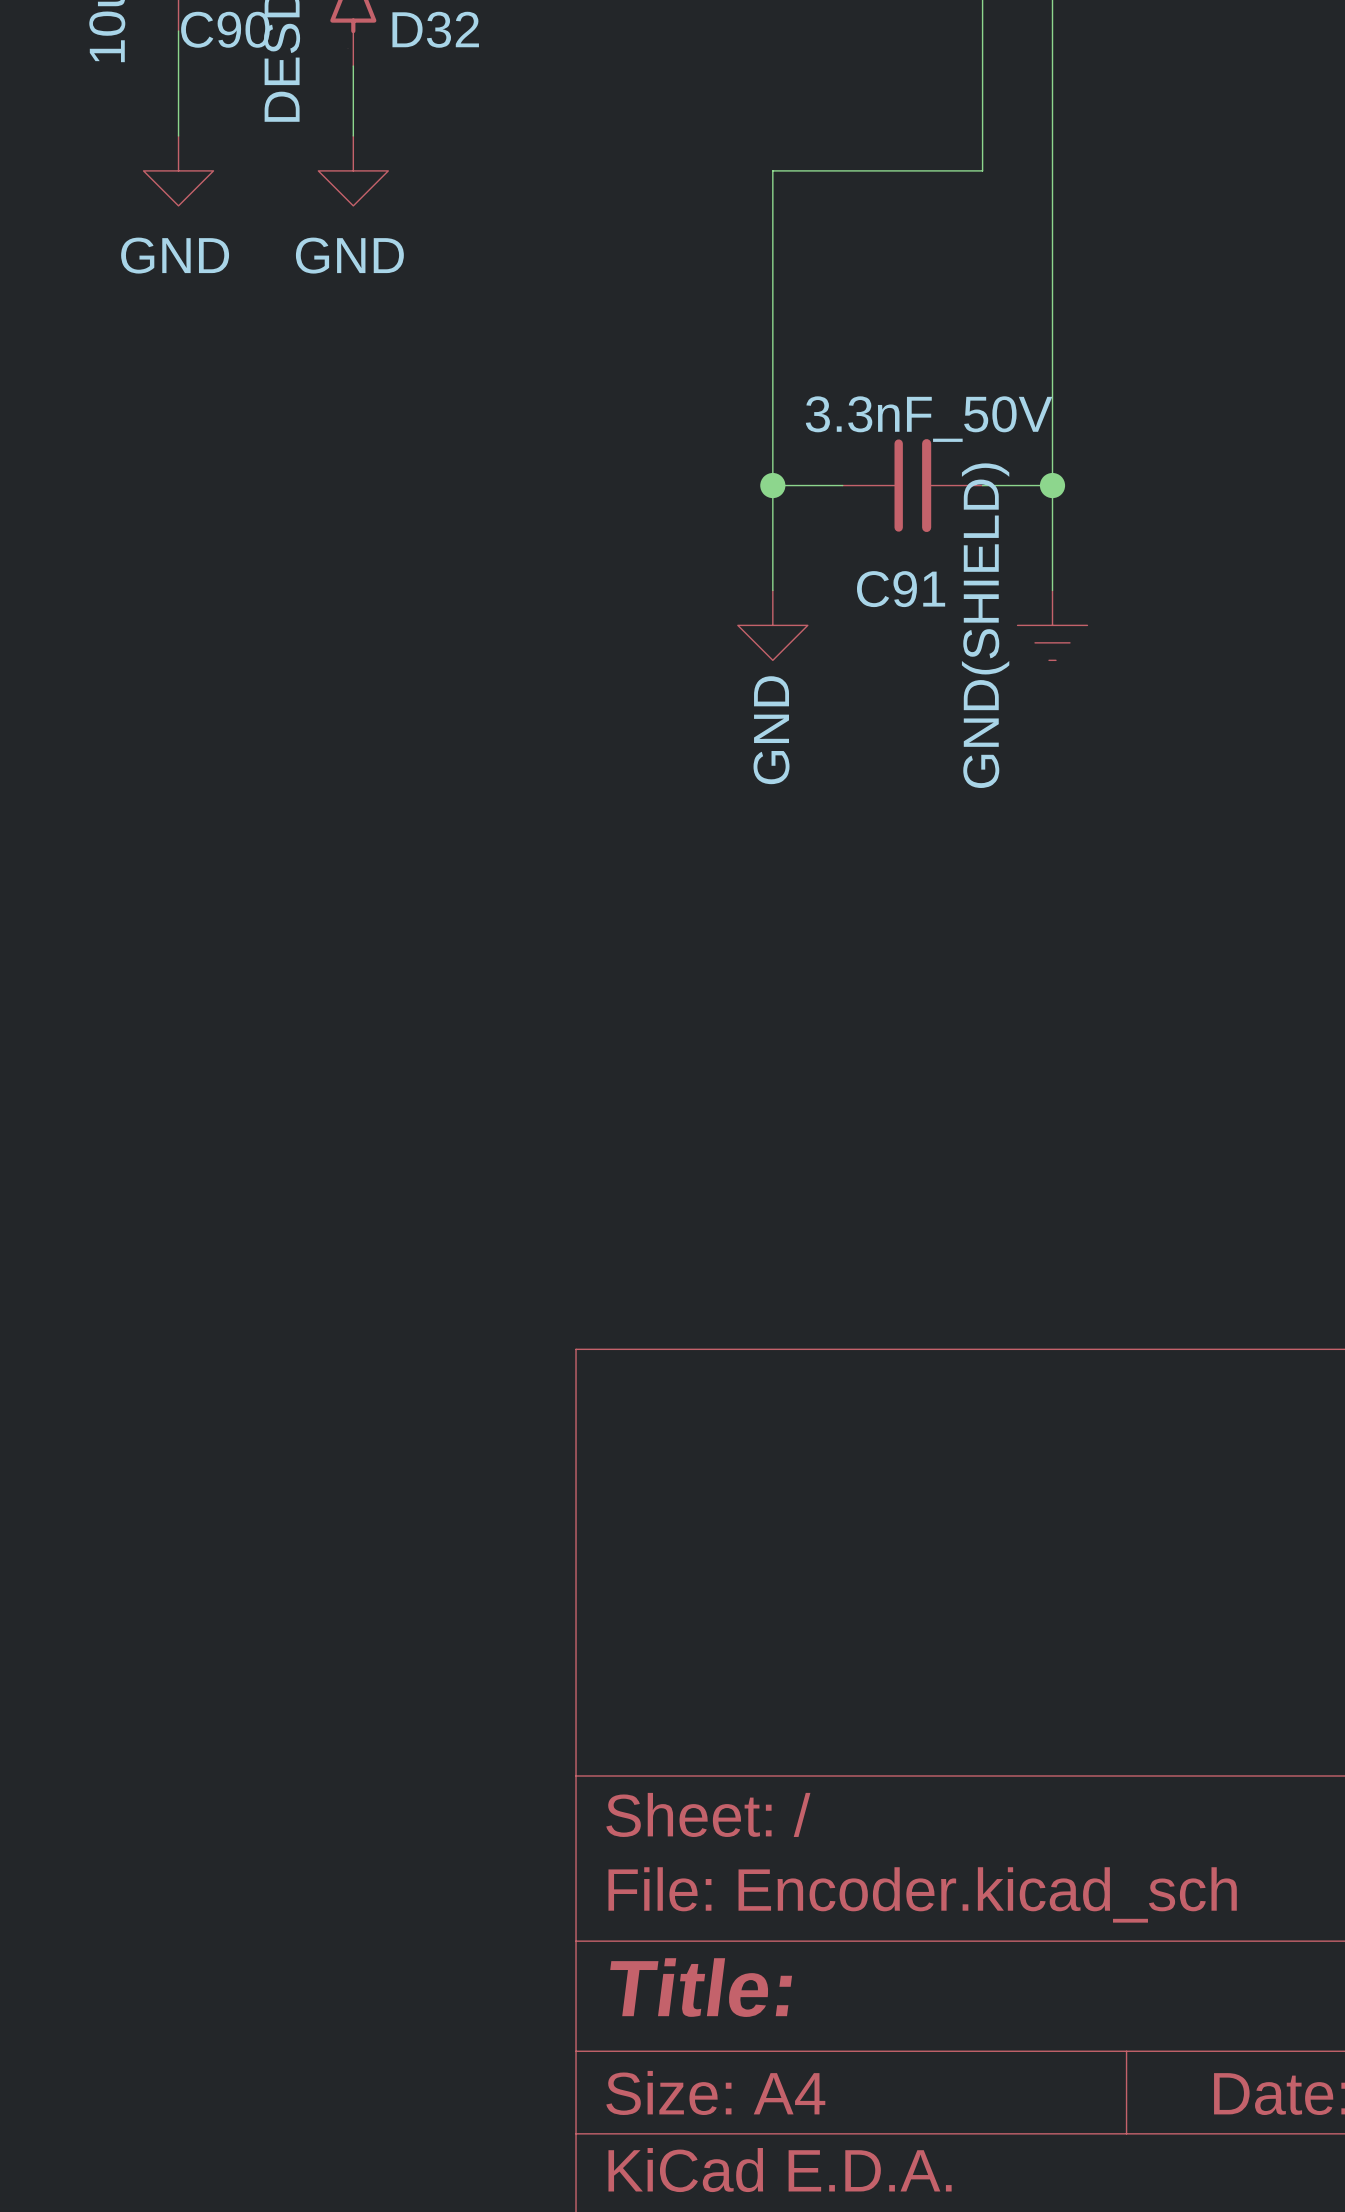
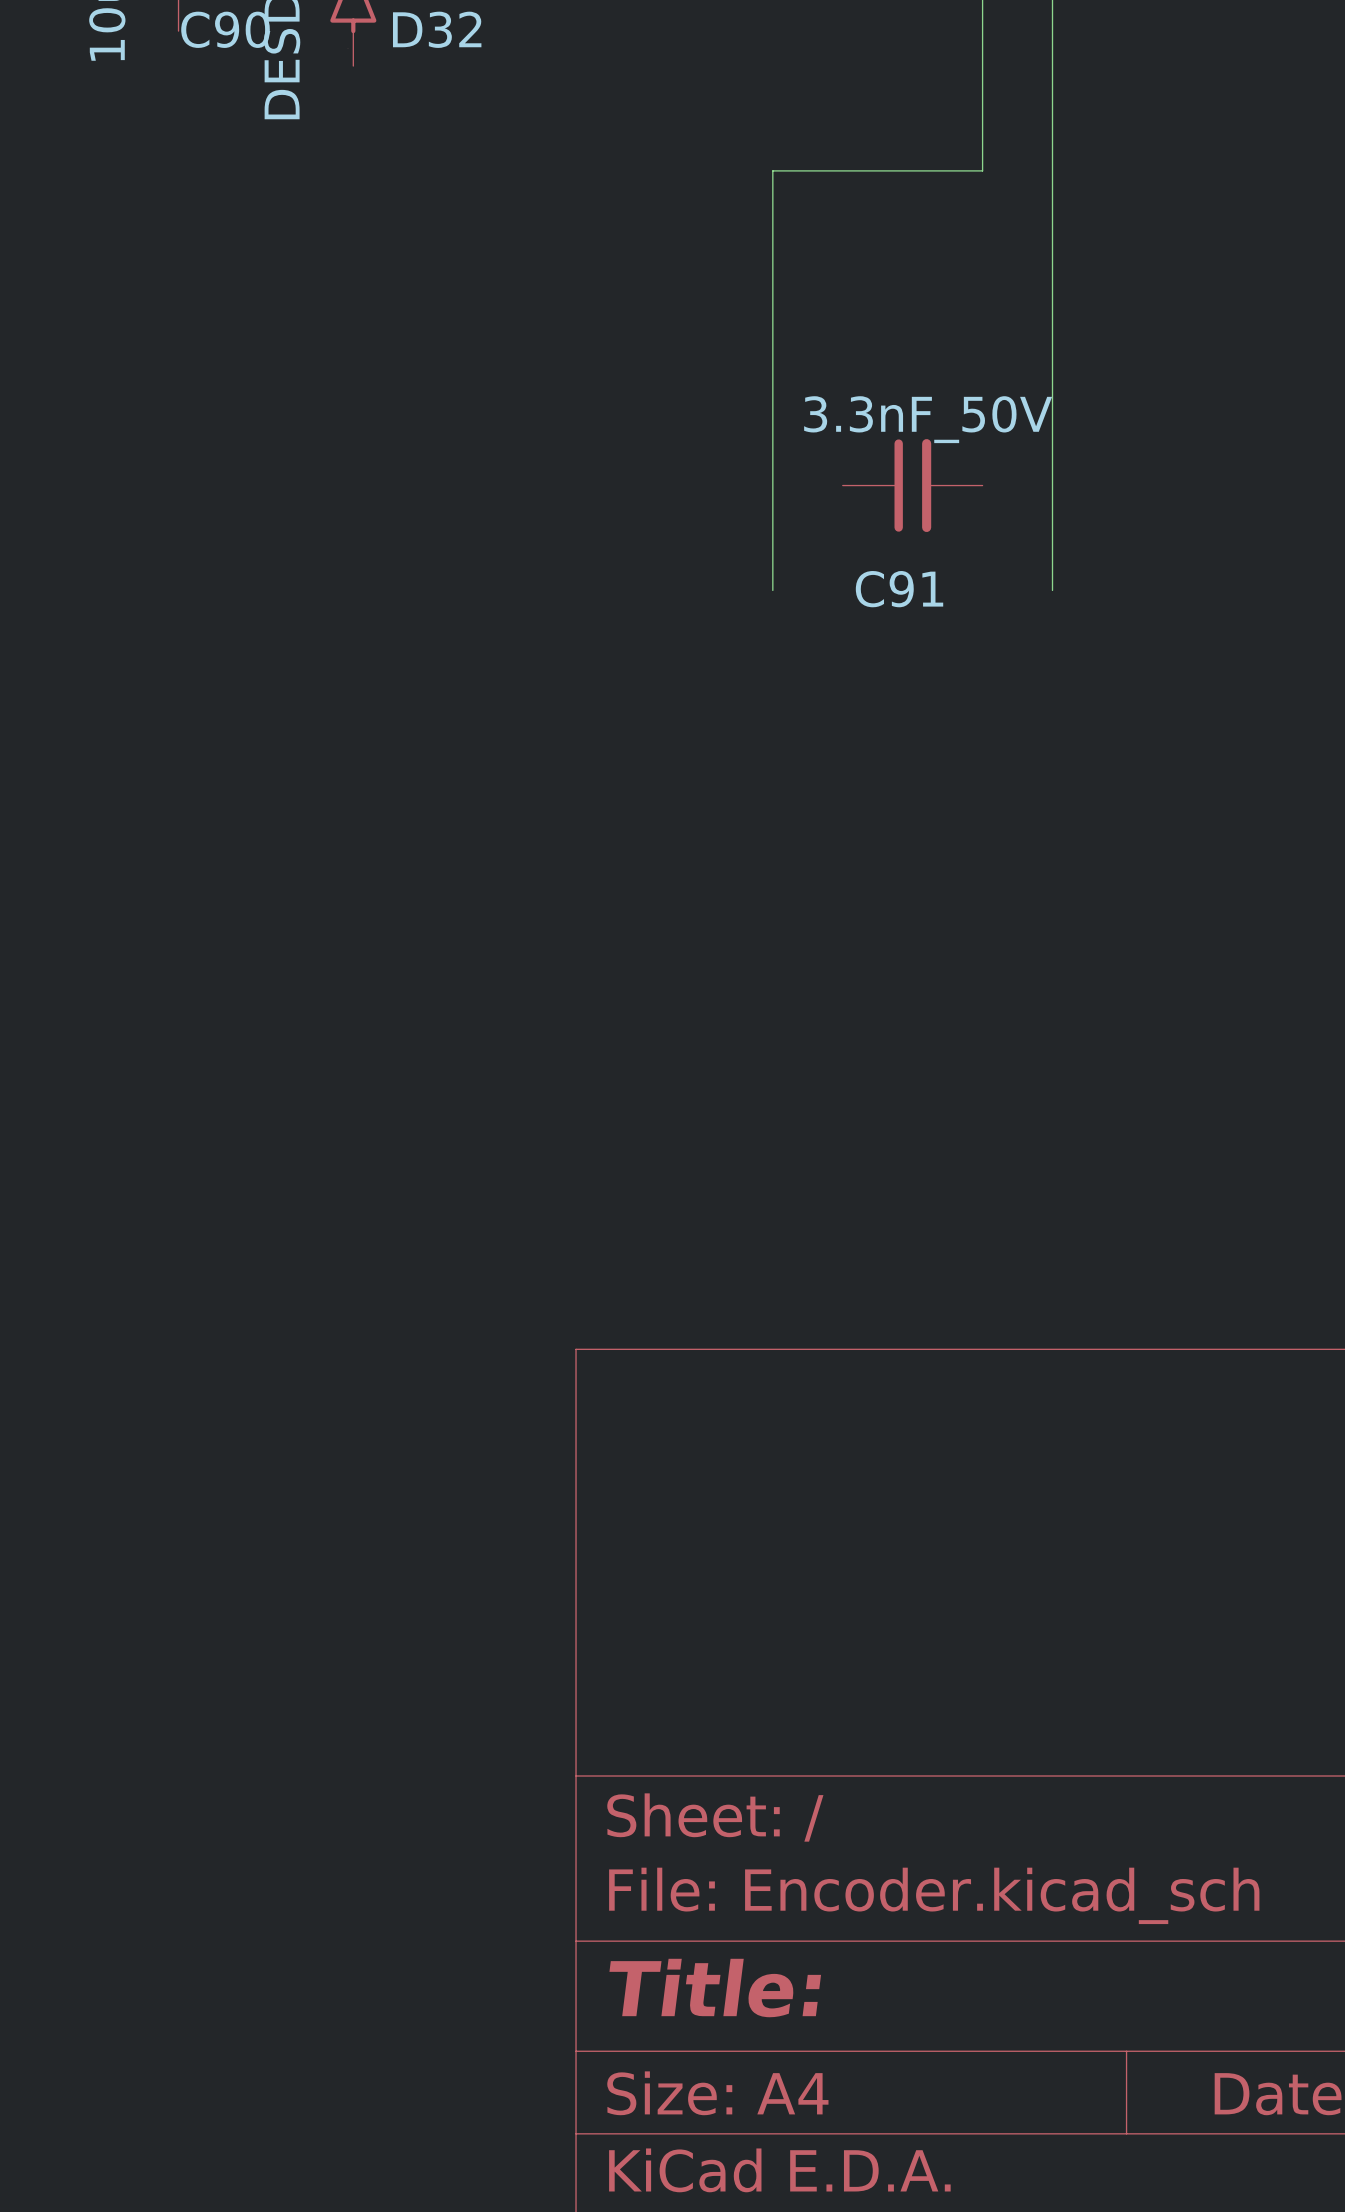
wire: (178, 31) (178, 135) -> none
wire: (353, 66) (353, 135) -> none
power symbol: GND (178, 170) -> none
power symbol: GND (353, 170) -> none
wire: (772, 485) (842, 485) -> none
junction: (772, 485) -> none
wire: (982, 485) (1052, 485) -> none
junction: (1052, 485) -> none
power symbol: GND (772, 625) -> none
power symbol: GND(SHIELD) (1052, 625) -> none

